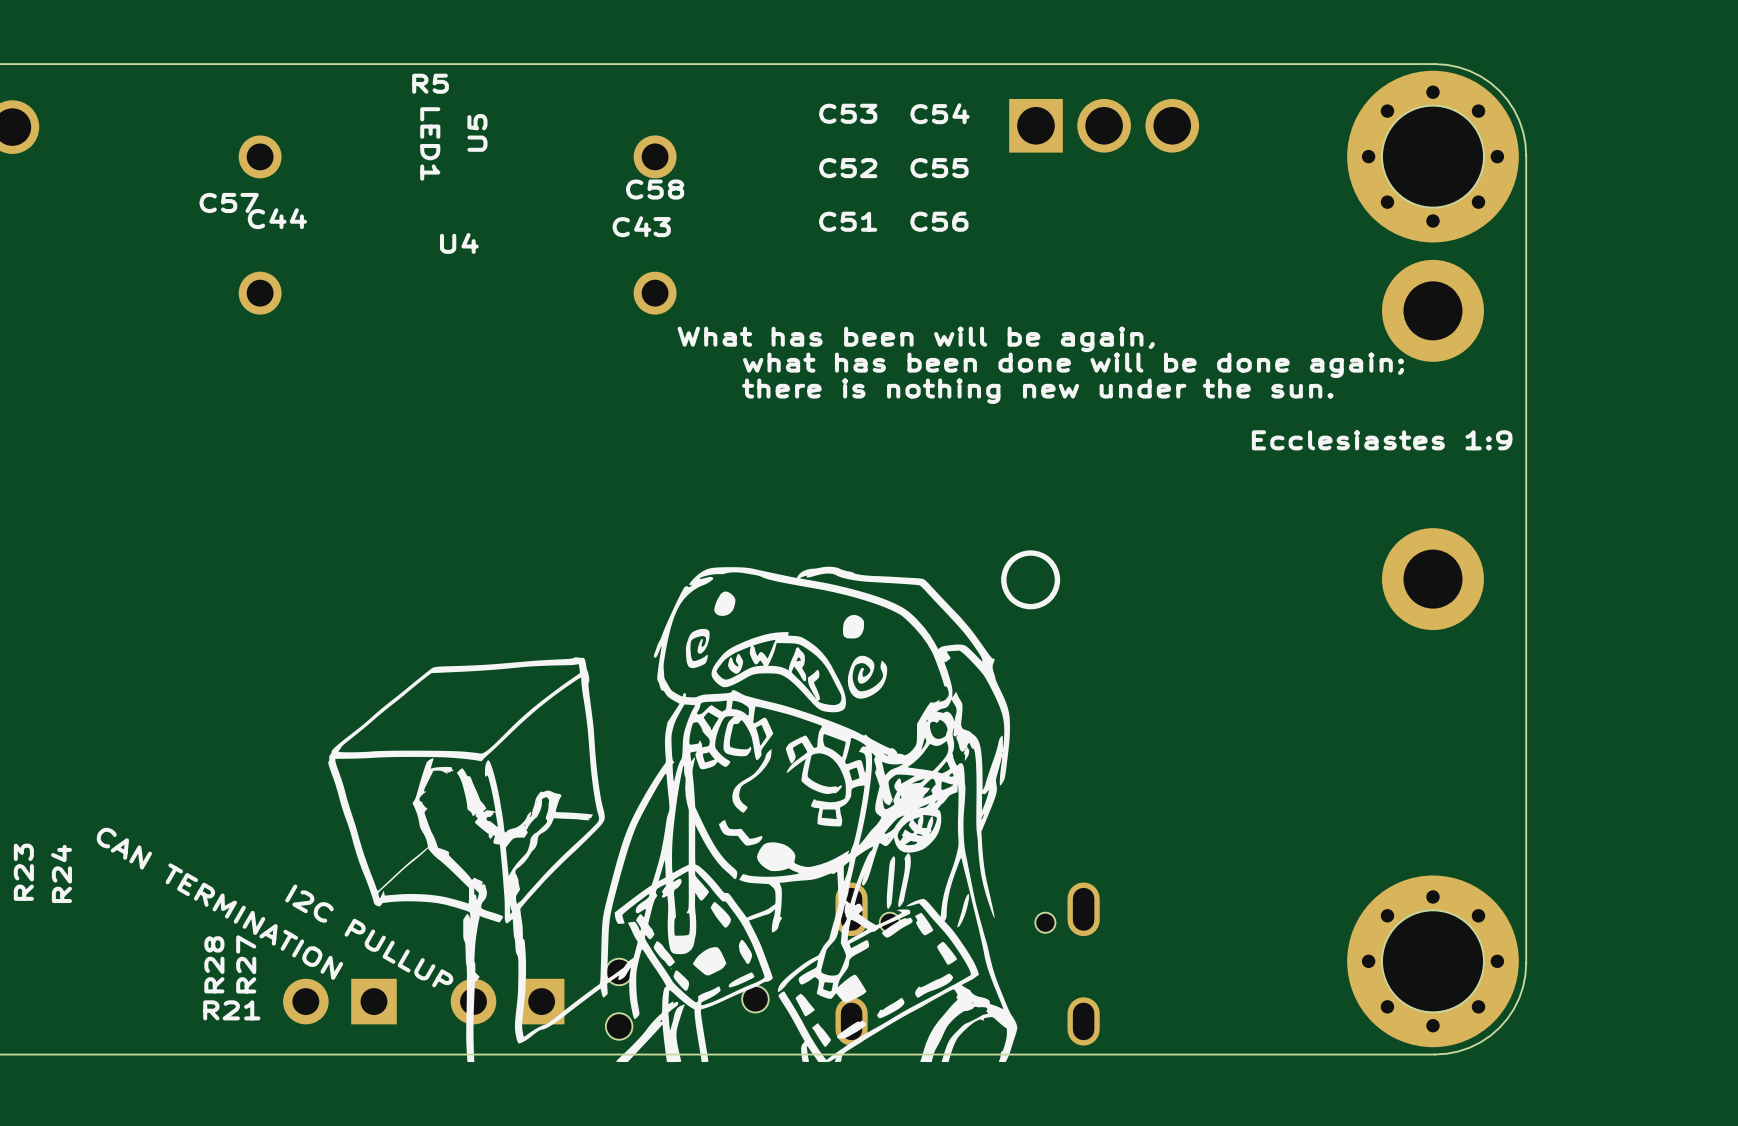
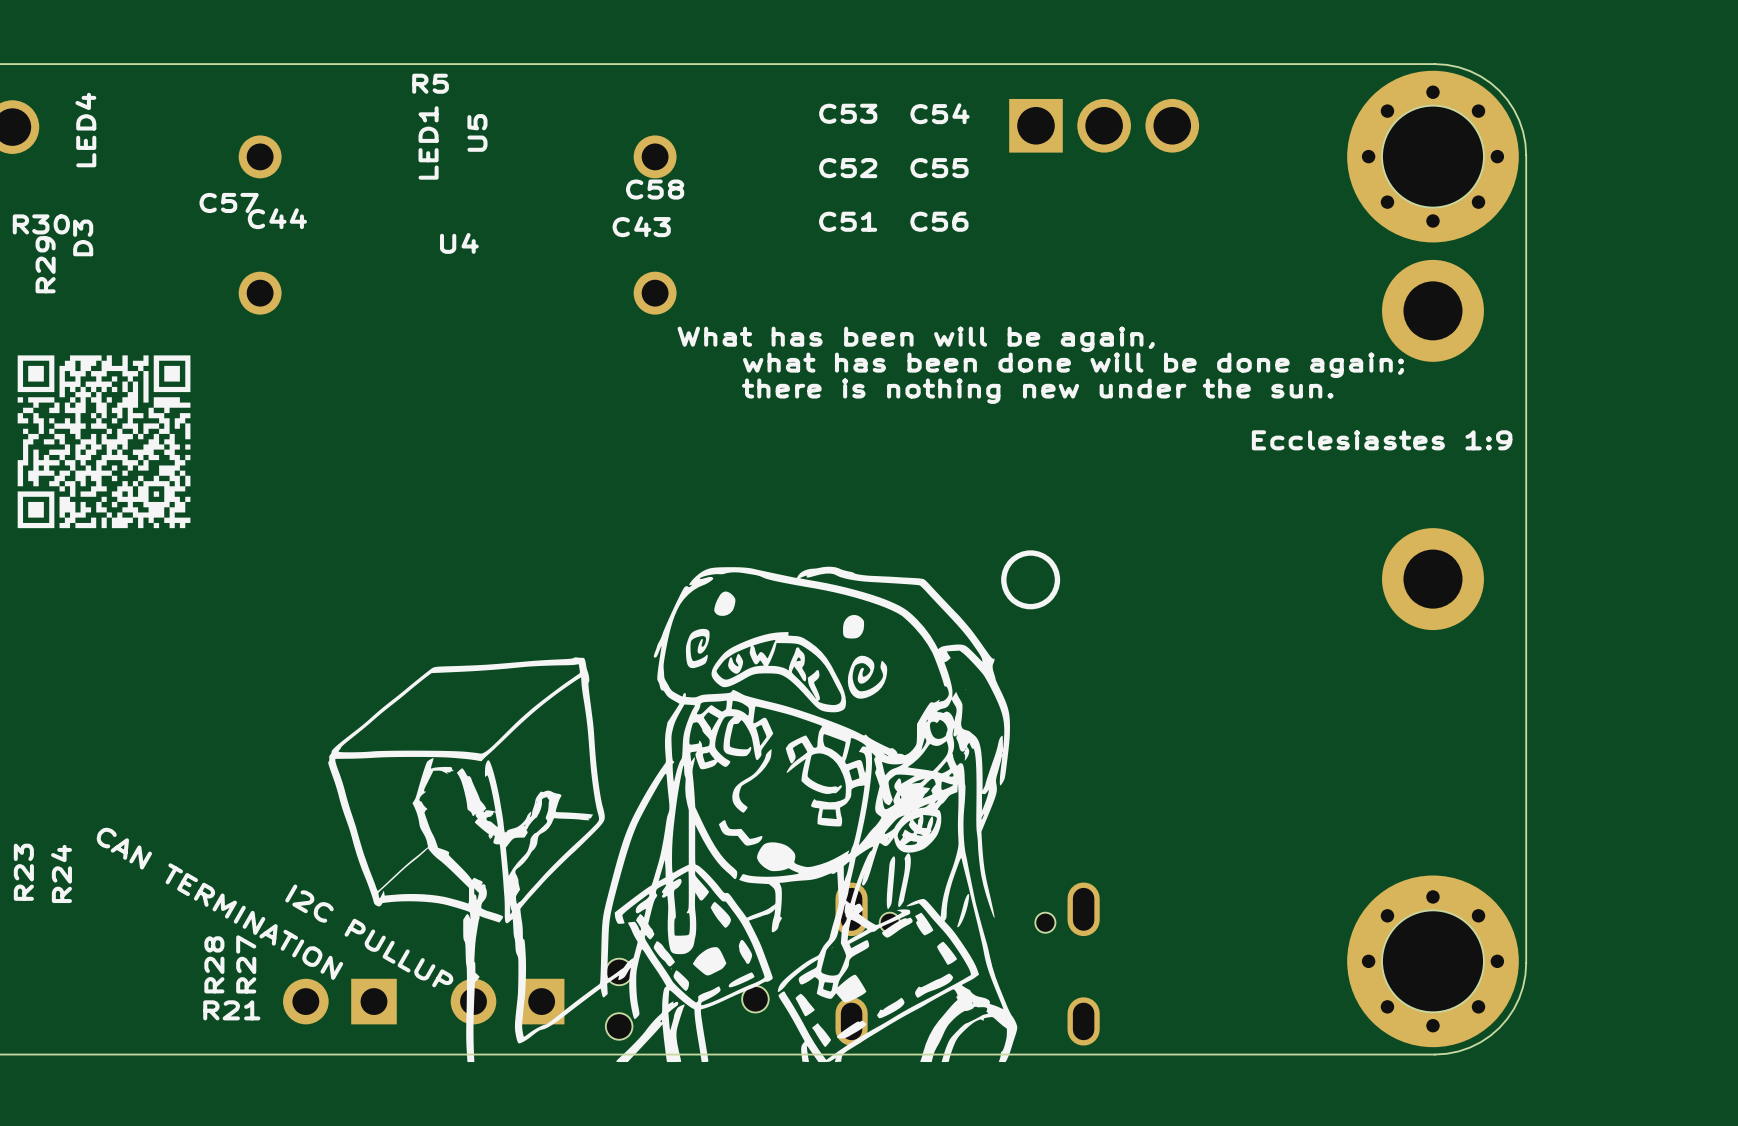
LED4: none -> (85, 130)
LED1 name rotation: 0° (430, 143) -> 180° (428, 142)
R30: none -> (41, 224)
D3: none -> (83, 237)
R29: none -> (45, 264)
drawing: none -> [17, 355, 191, 529]

